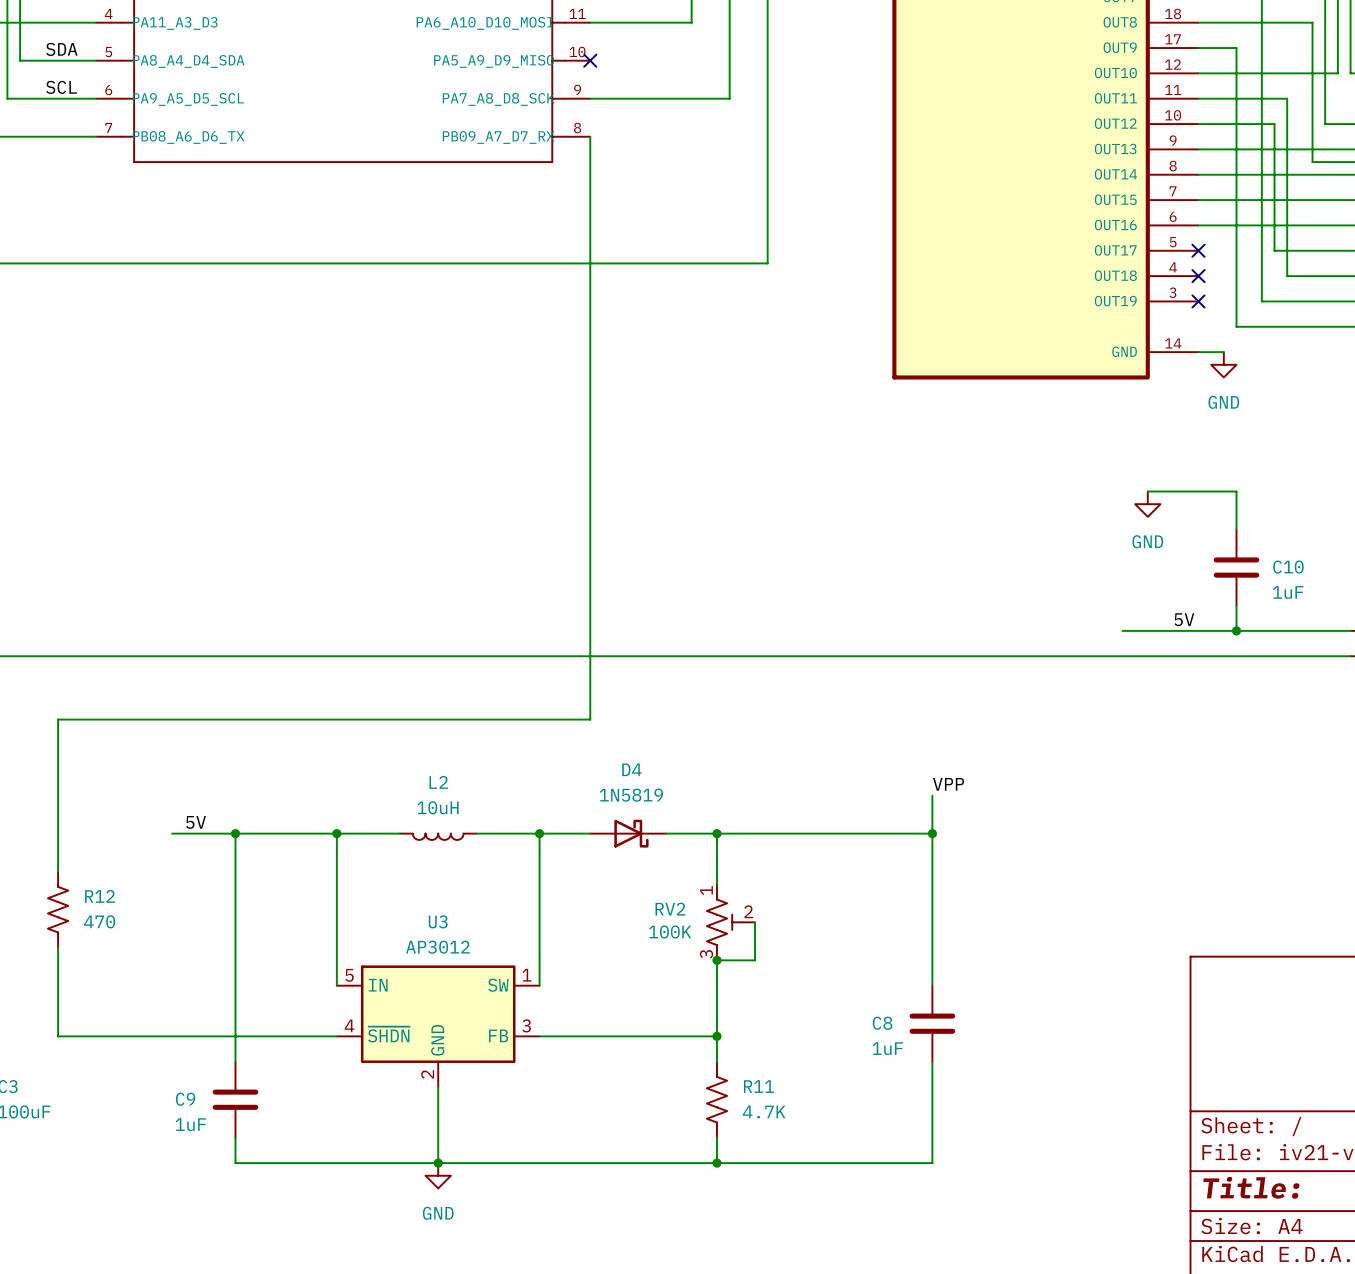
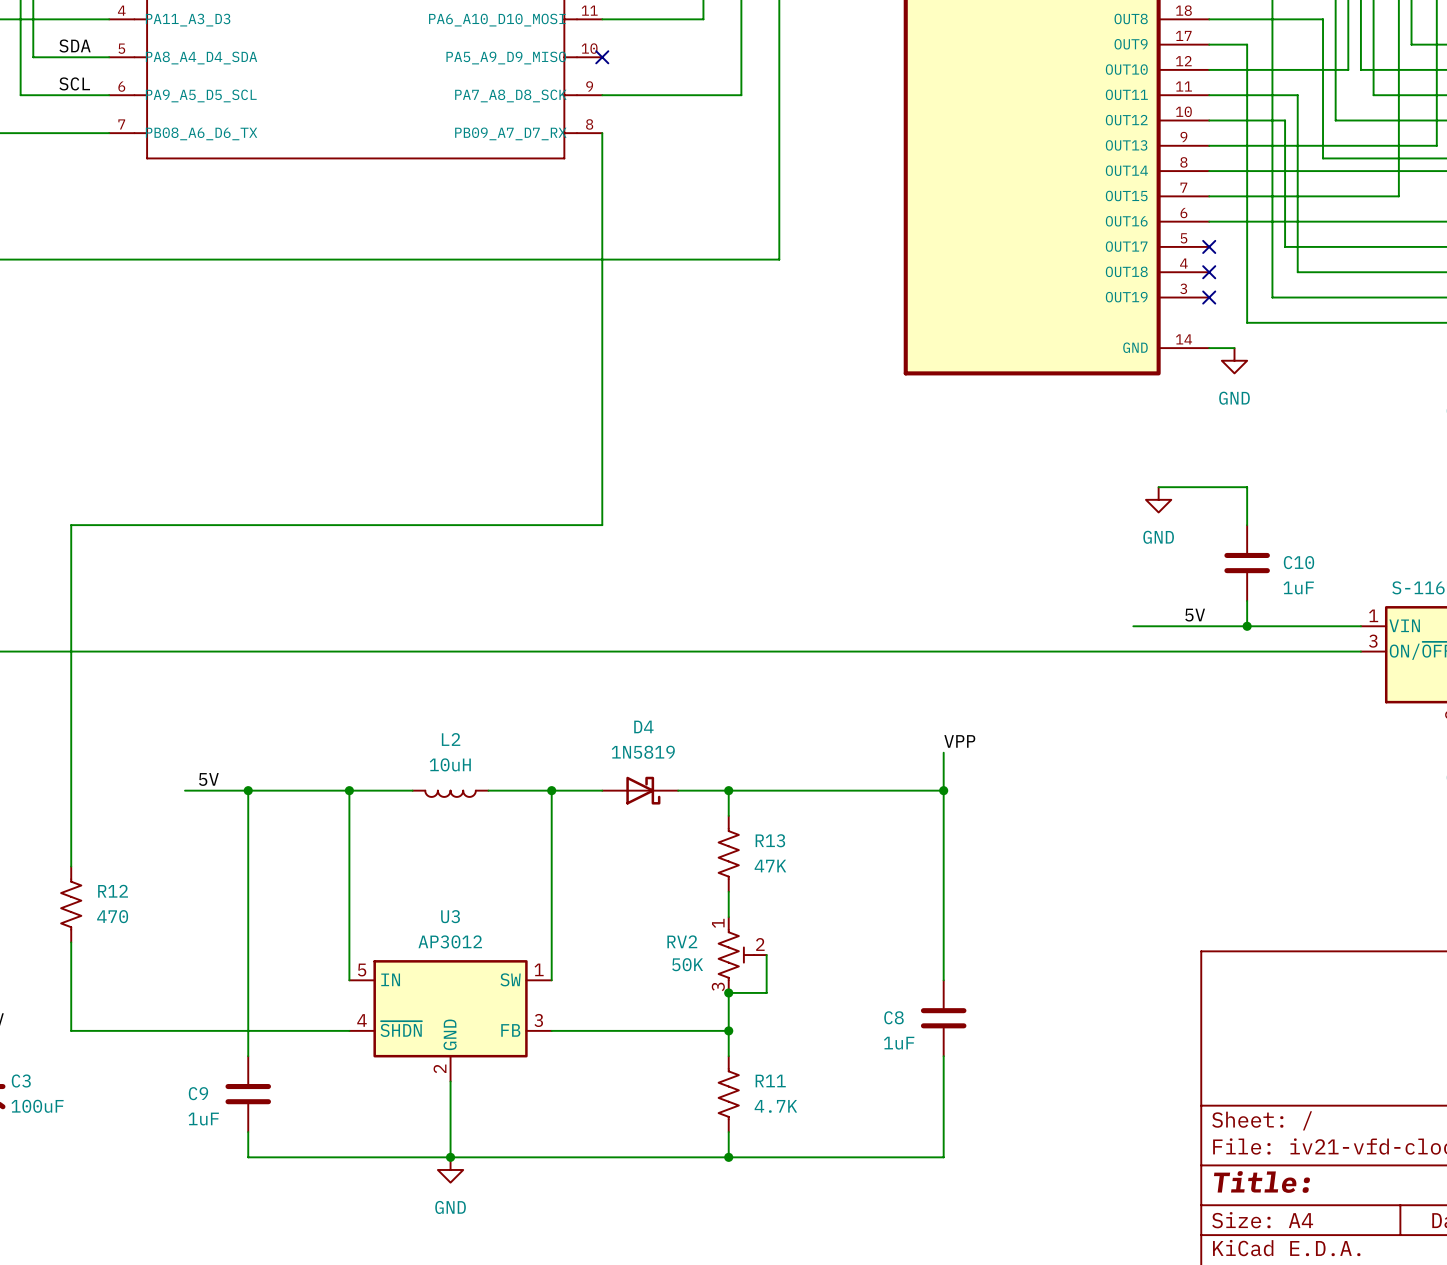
wire: (590, 529) (590, 719) (58, 719) -> (602, 525) (71, 525) (71, 714)
wire: none -> (943, 752) (943, 790) (678, 790)
label position: VPP (948, 784) -> VPP (959, 741)
wire: none -> (248, 790) (248, 828)
wire: none -> (349, 790) (349, 828)
wire: none -> (551, 790) (551, 828)
wire: none -> (728, 790) (728, 815)
label position: 5V (196, 822) -> 5V (208, 779)
wire: (172, 833) (400, 833) -> (185, 790) (412, 790)
junction position: (235, 833) -> (248, 790)
junction position: (336, 833) -> (349, 790)
wire: (476, 833) (590, 833) -> (488, 790) (602, 790)
junction position: (539, 833) -> (551, 790)
D4 position: (628, 833) -> (640, 790)
wire: (666, 833) (932, 833) -> none
wire: (716, 833) (716, 884) -> none
junction position: (716, 833) -> (728, 790)
junction position: (932, 833) -> (943, 790)
L2 position: (438, 836) -> (450, 793)
R13: none -> 47K (728, 853)
wire: none -> (728, 891) (728, 917)
RV2 position: (730, 922) -> (742, 955)
wire: (755, 922) (755, 960) (716, 960) (716, 998) -> (766, 955) (766, 992) (728, 992)
RV2 value: 100K (670, 932) -> 50K (687, 964)
junction position: (716, 960) -> (728, 992)

